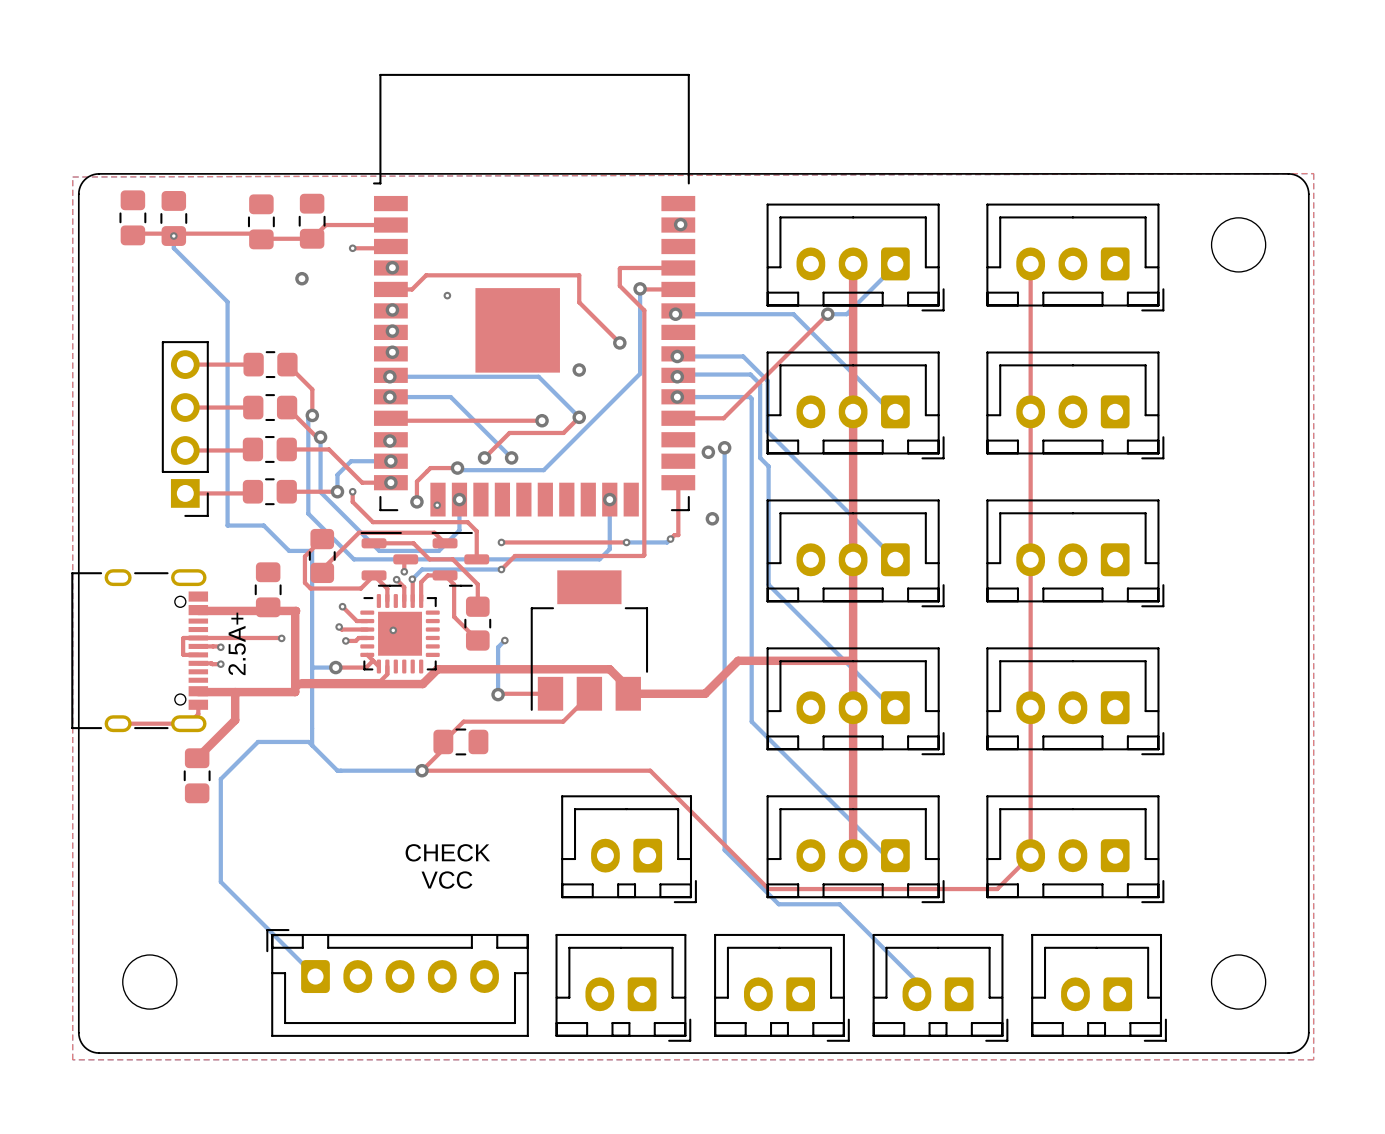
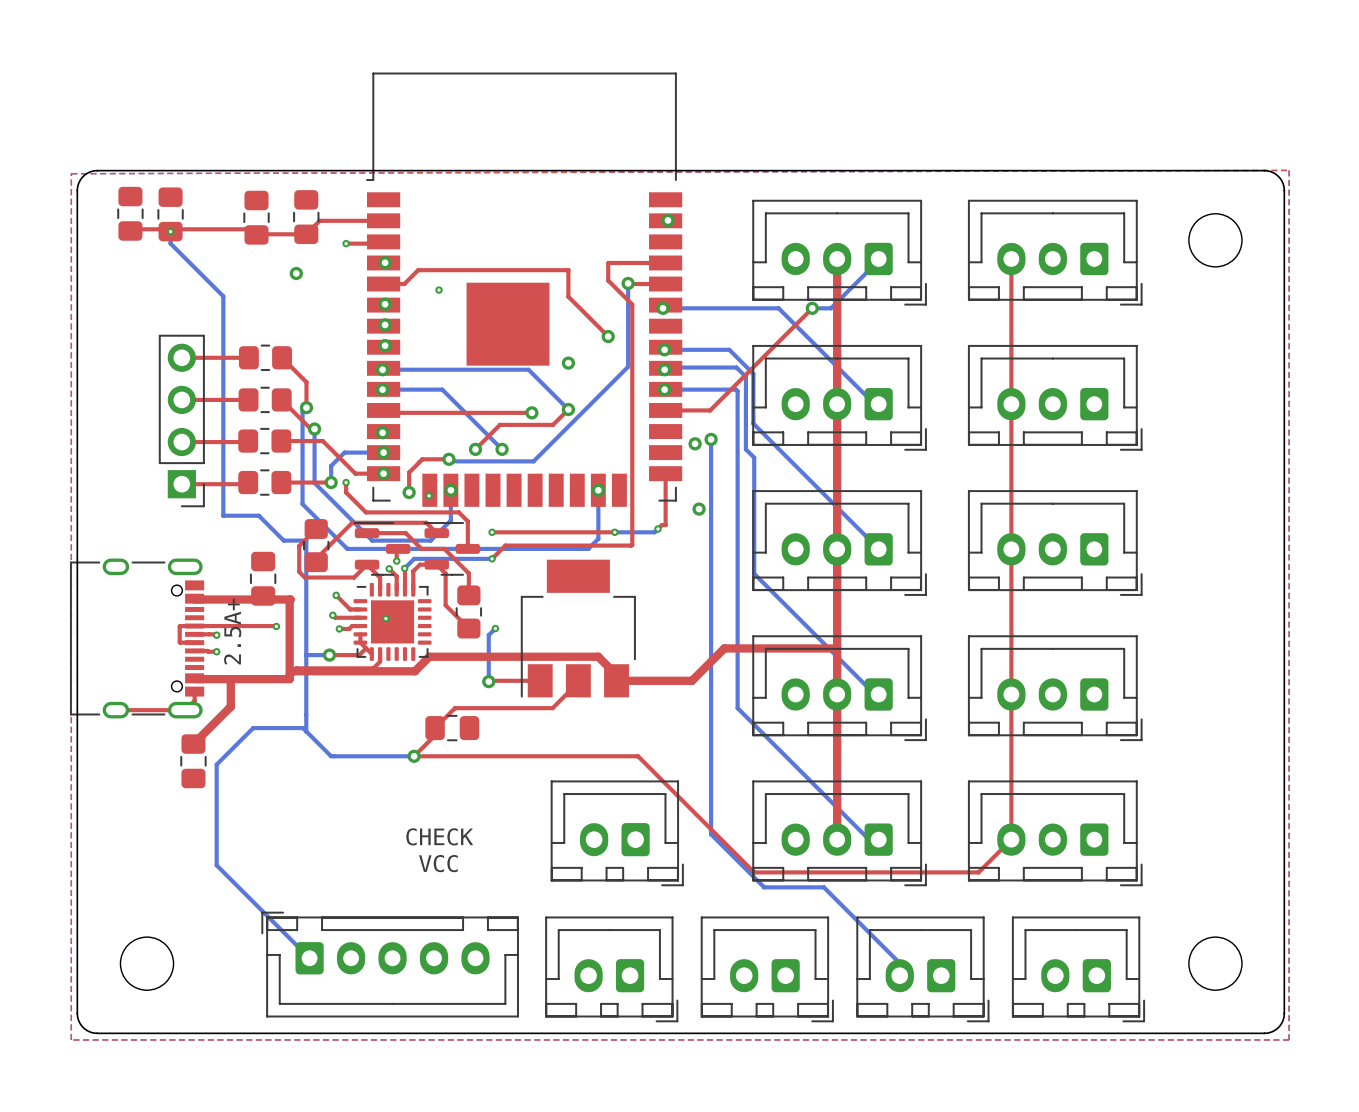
top track: none -> (360, 634) (360, 642)

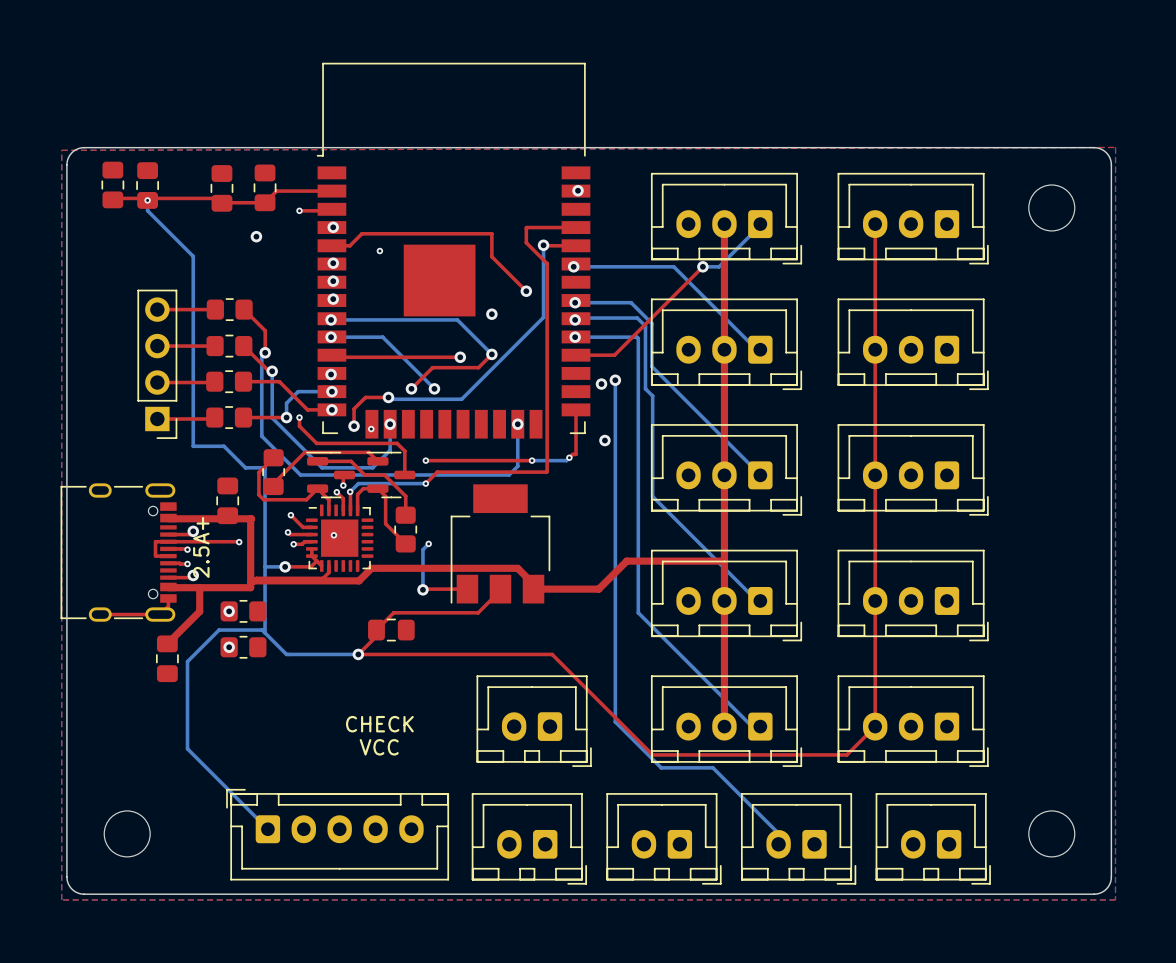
top track: none -> (193, 531) (190, 534) (168, 534)
via: none -> (193, 531)
top track: none -> (193, 575) (191, 577) (168, 577)
via: none -> (193, 575)
via: none -> (229, 611)
part: none -> (243, 611)
via: none -> (229, 647)
part: none -> (243, 647)

